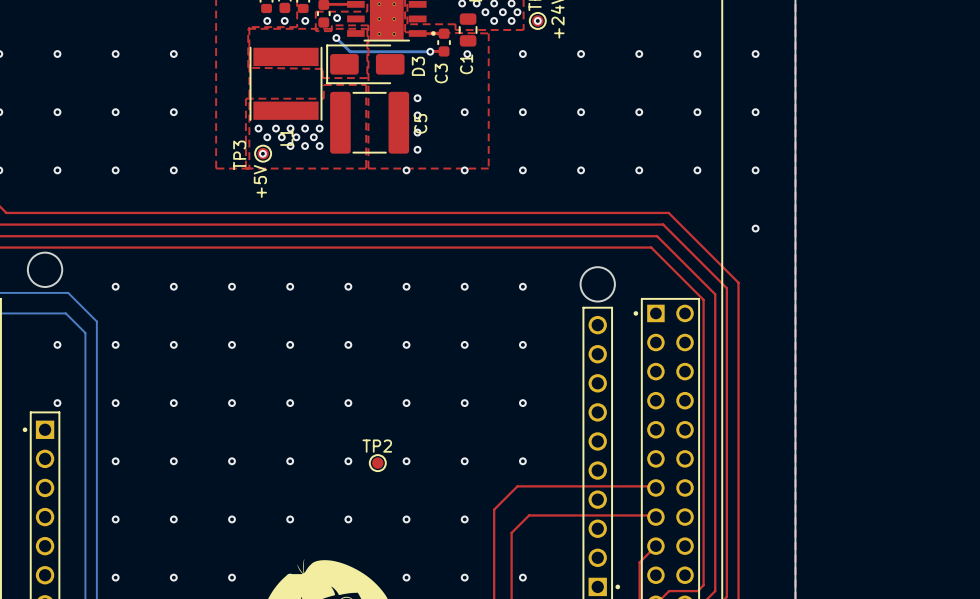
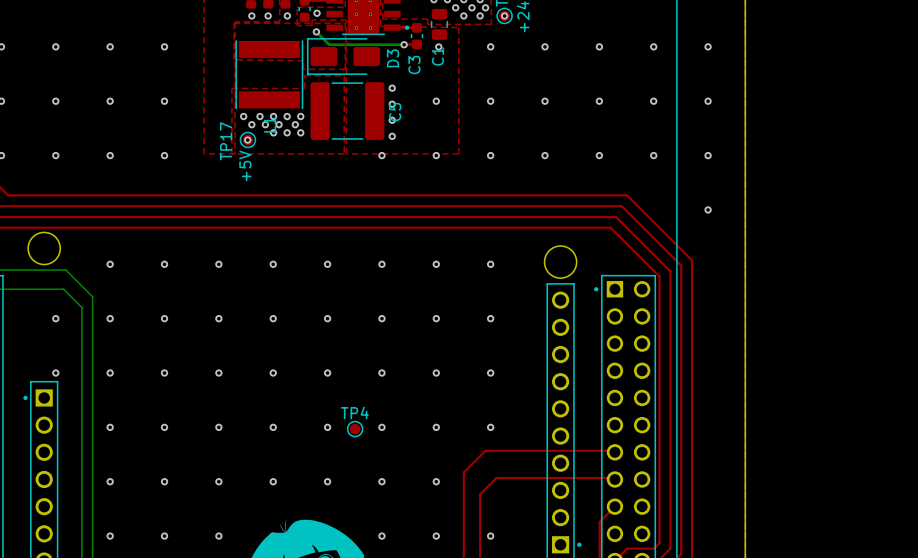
TP3 name: TP3 (239, 155) -> TP17 (226, 141)
TP2 name: TP2 (377, 446) -> TP4 (354, 412)

